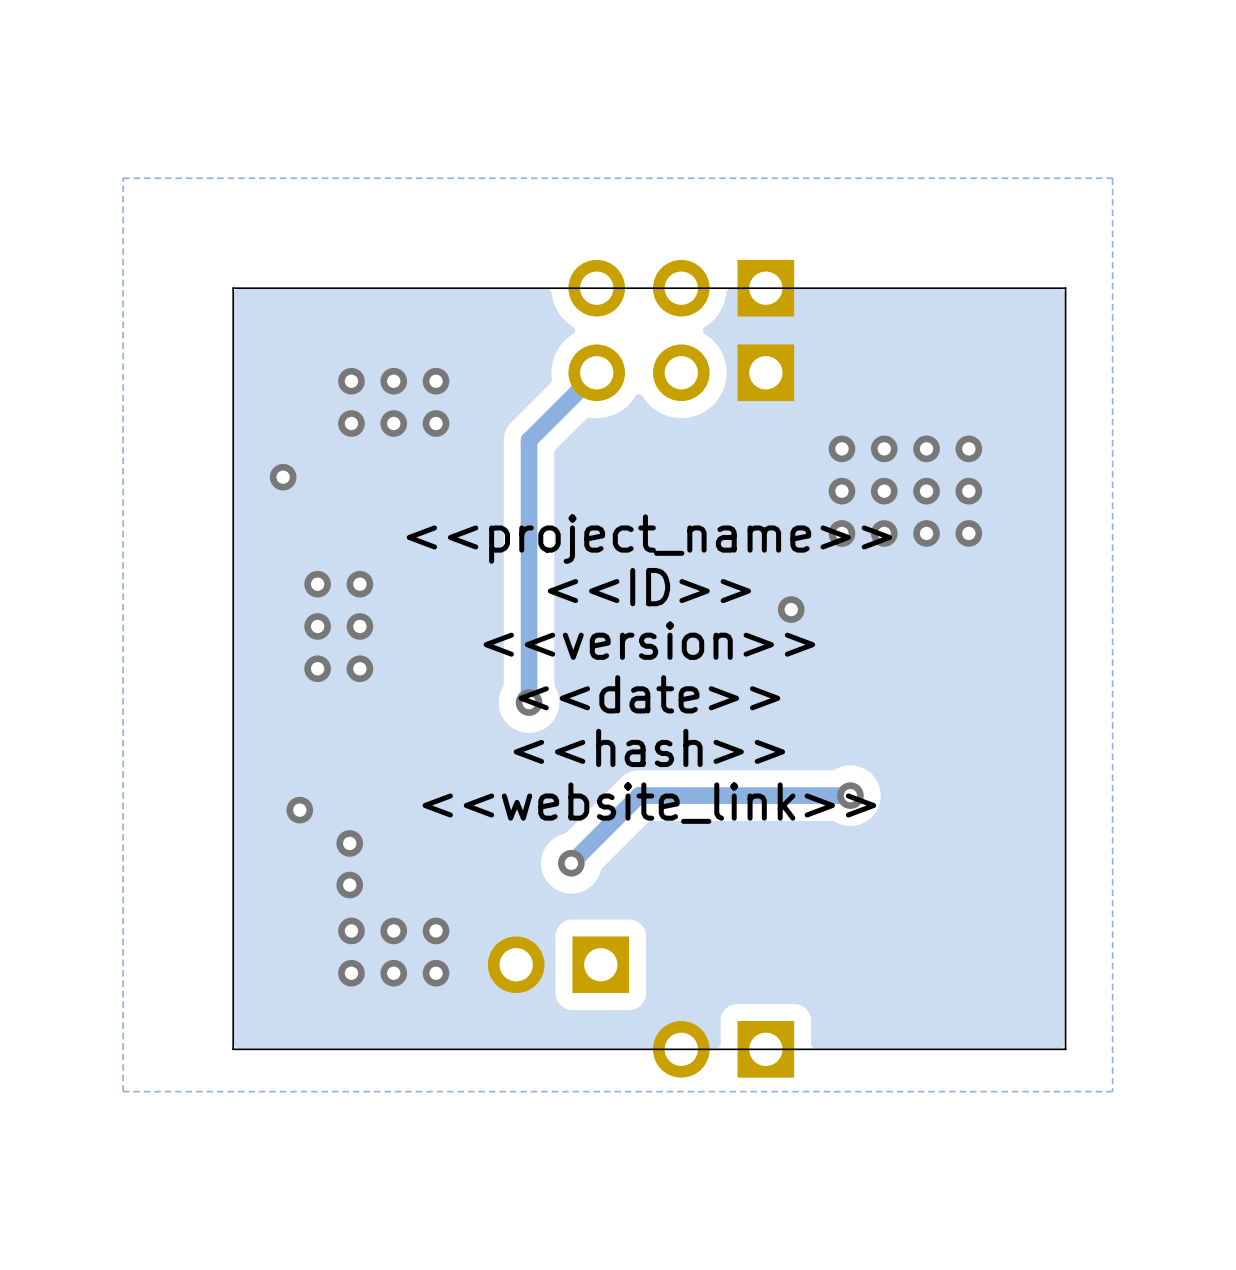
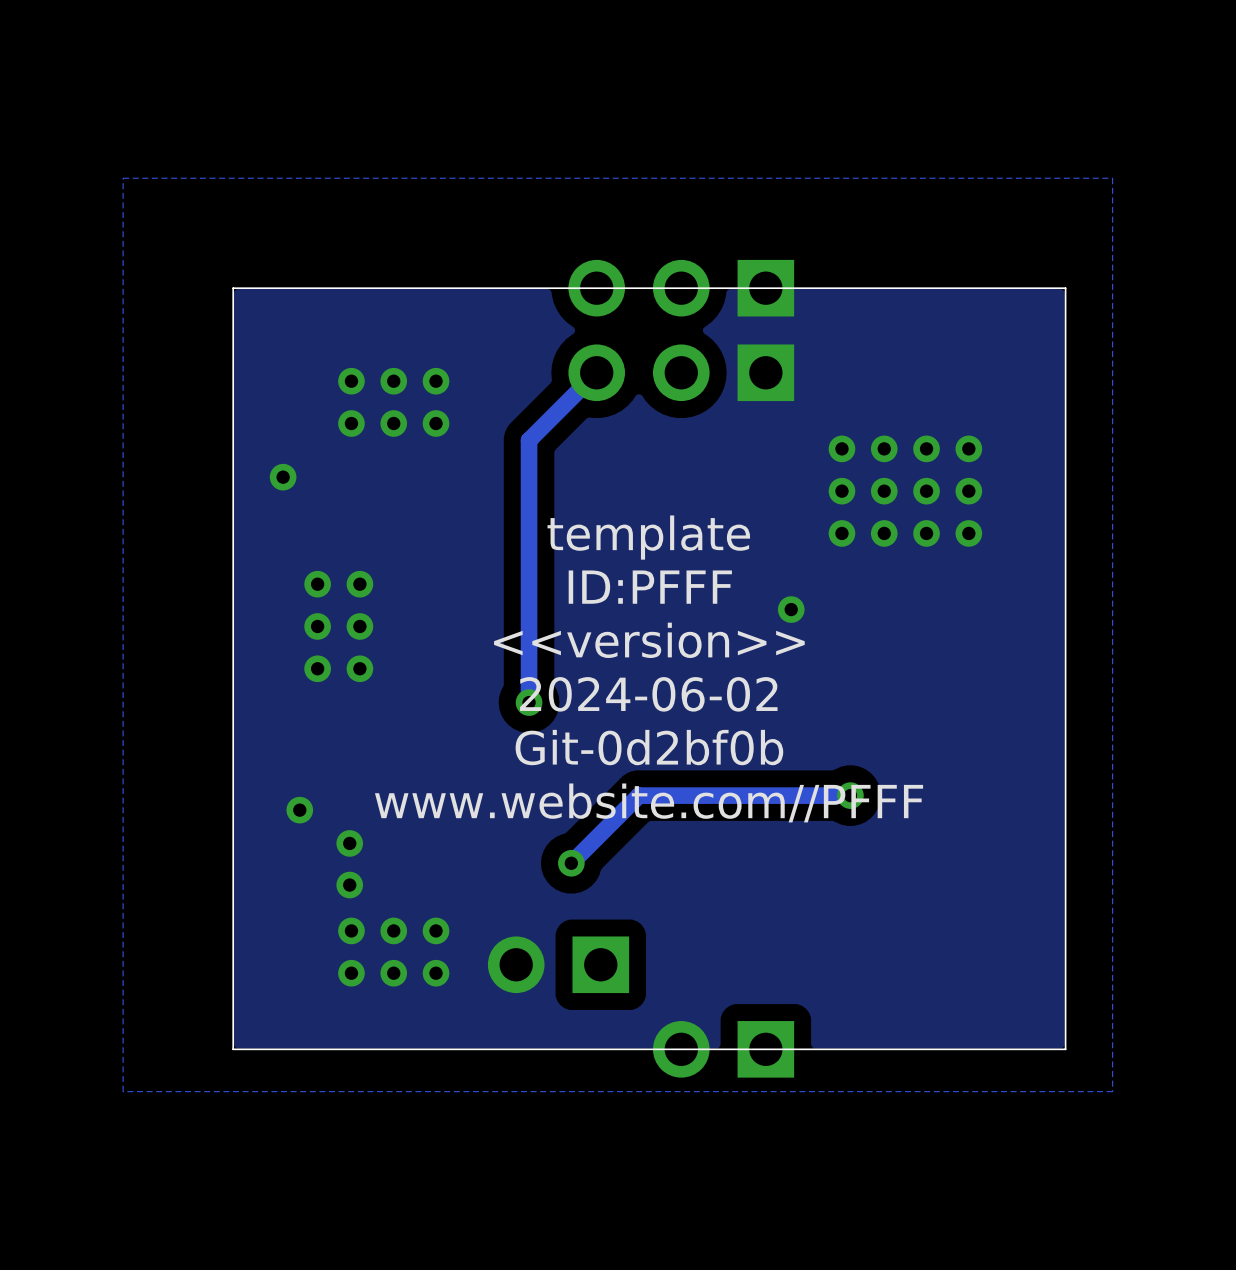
text: <<project_name>> (649, 539) -> template (648, 537)
text: <<ID>> (649, 587) -> ID:PFFF (650, 587)
text: <<date>> (649, 694) -> 2024-06-02 (648, 694)
text: <<hash>> (649, 747) -> Git-0d2bf0b (649, 747)
text: <<website_link>> (649, 803) -> www.website.com//PFFF (649, 802)

